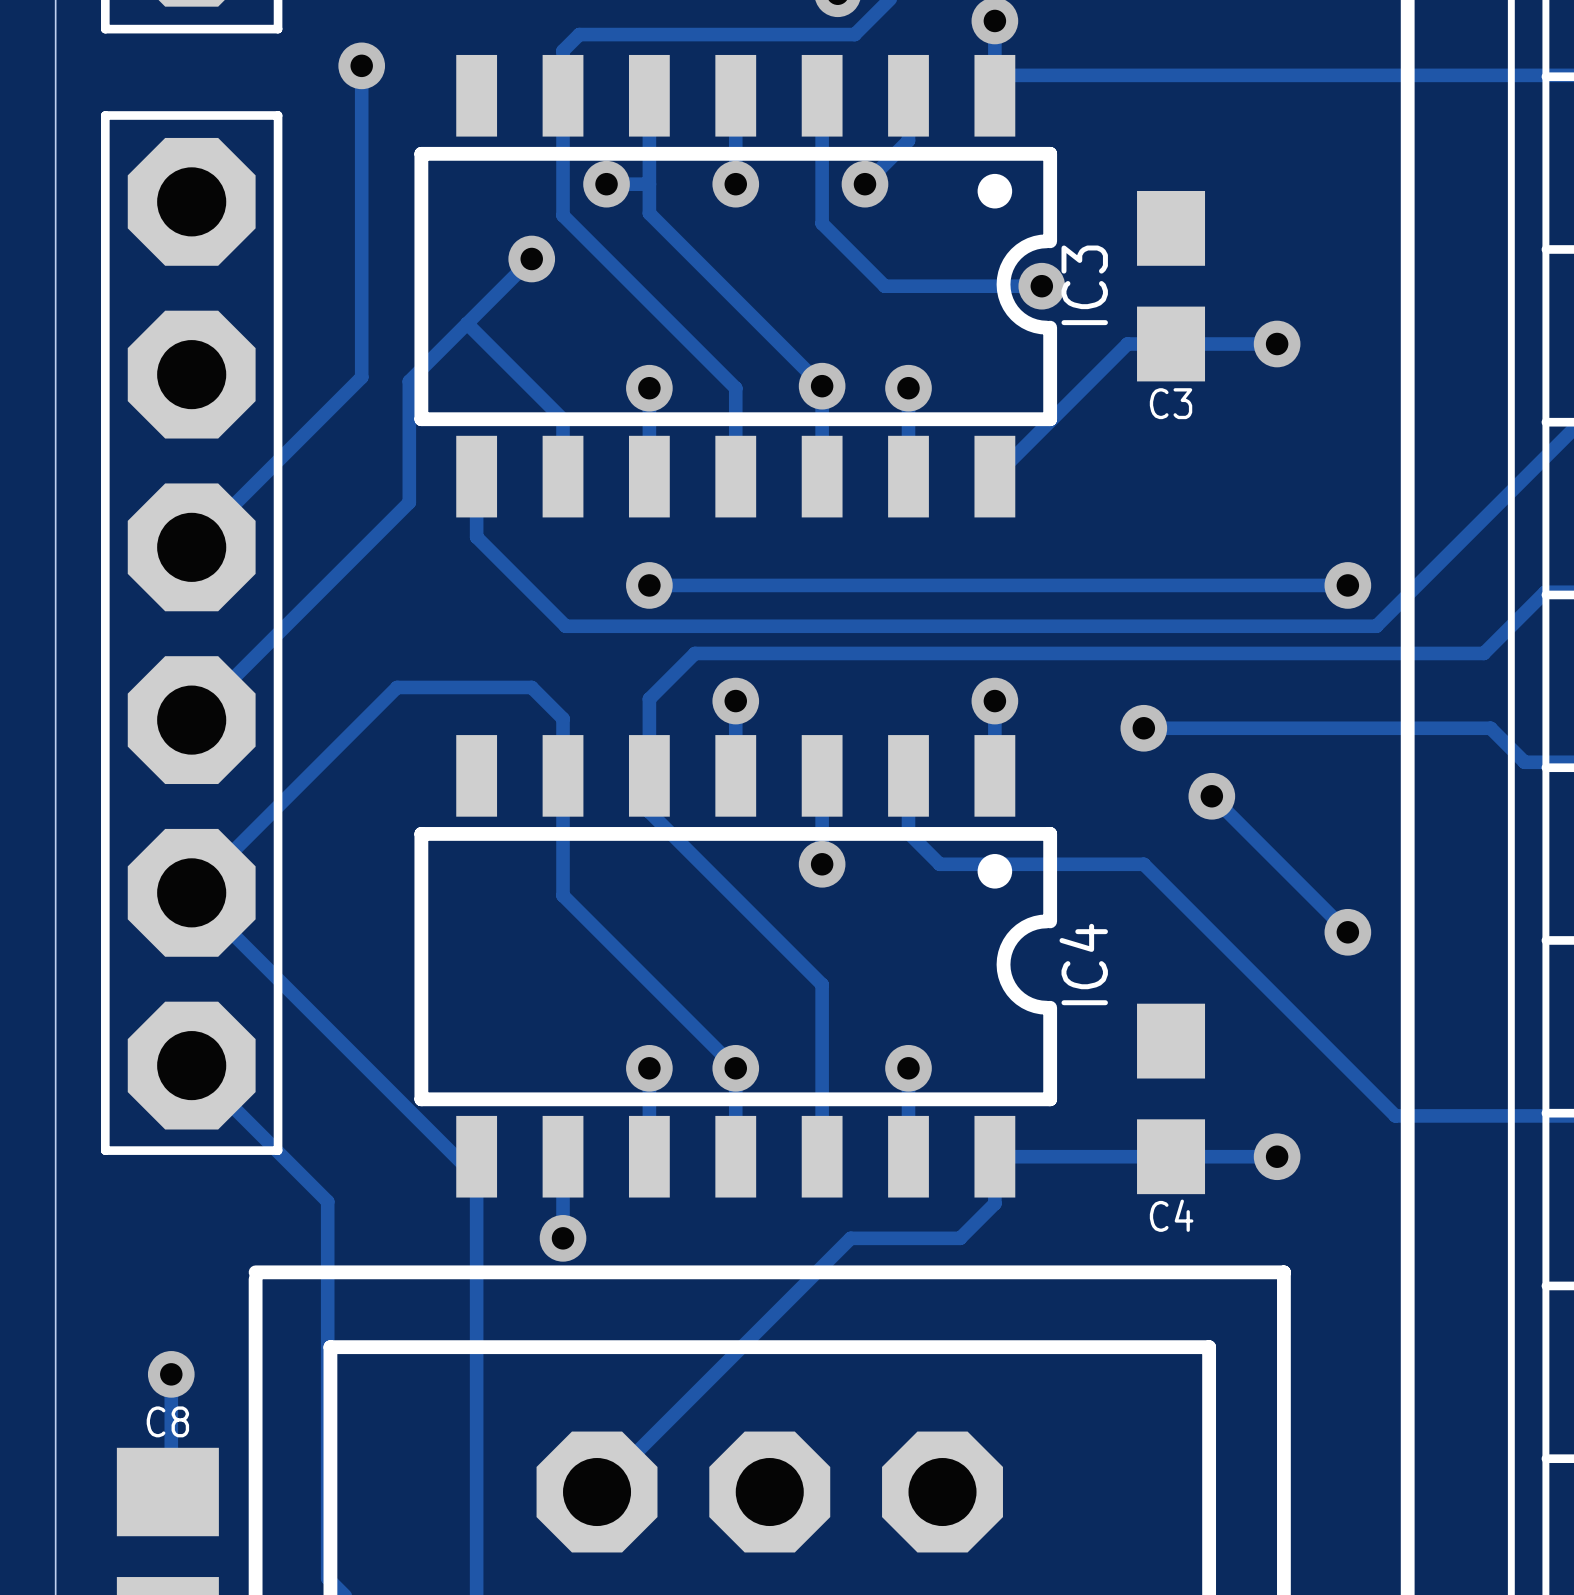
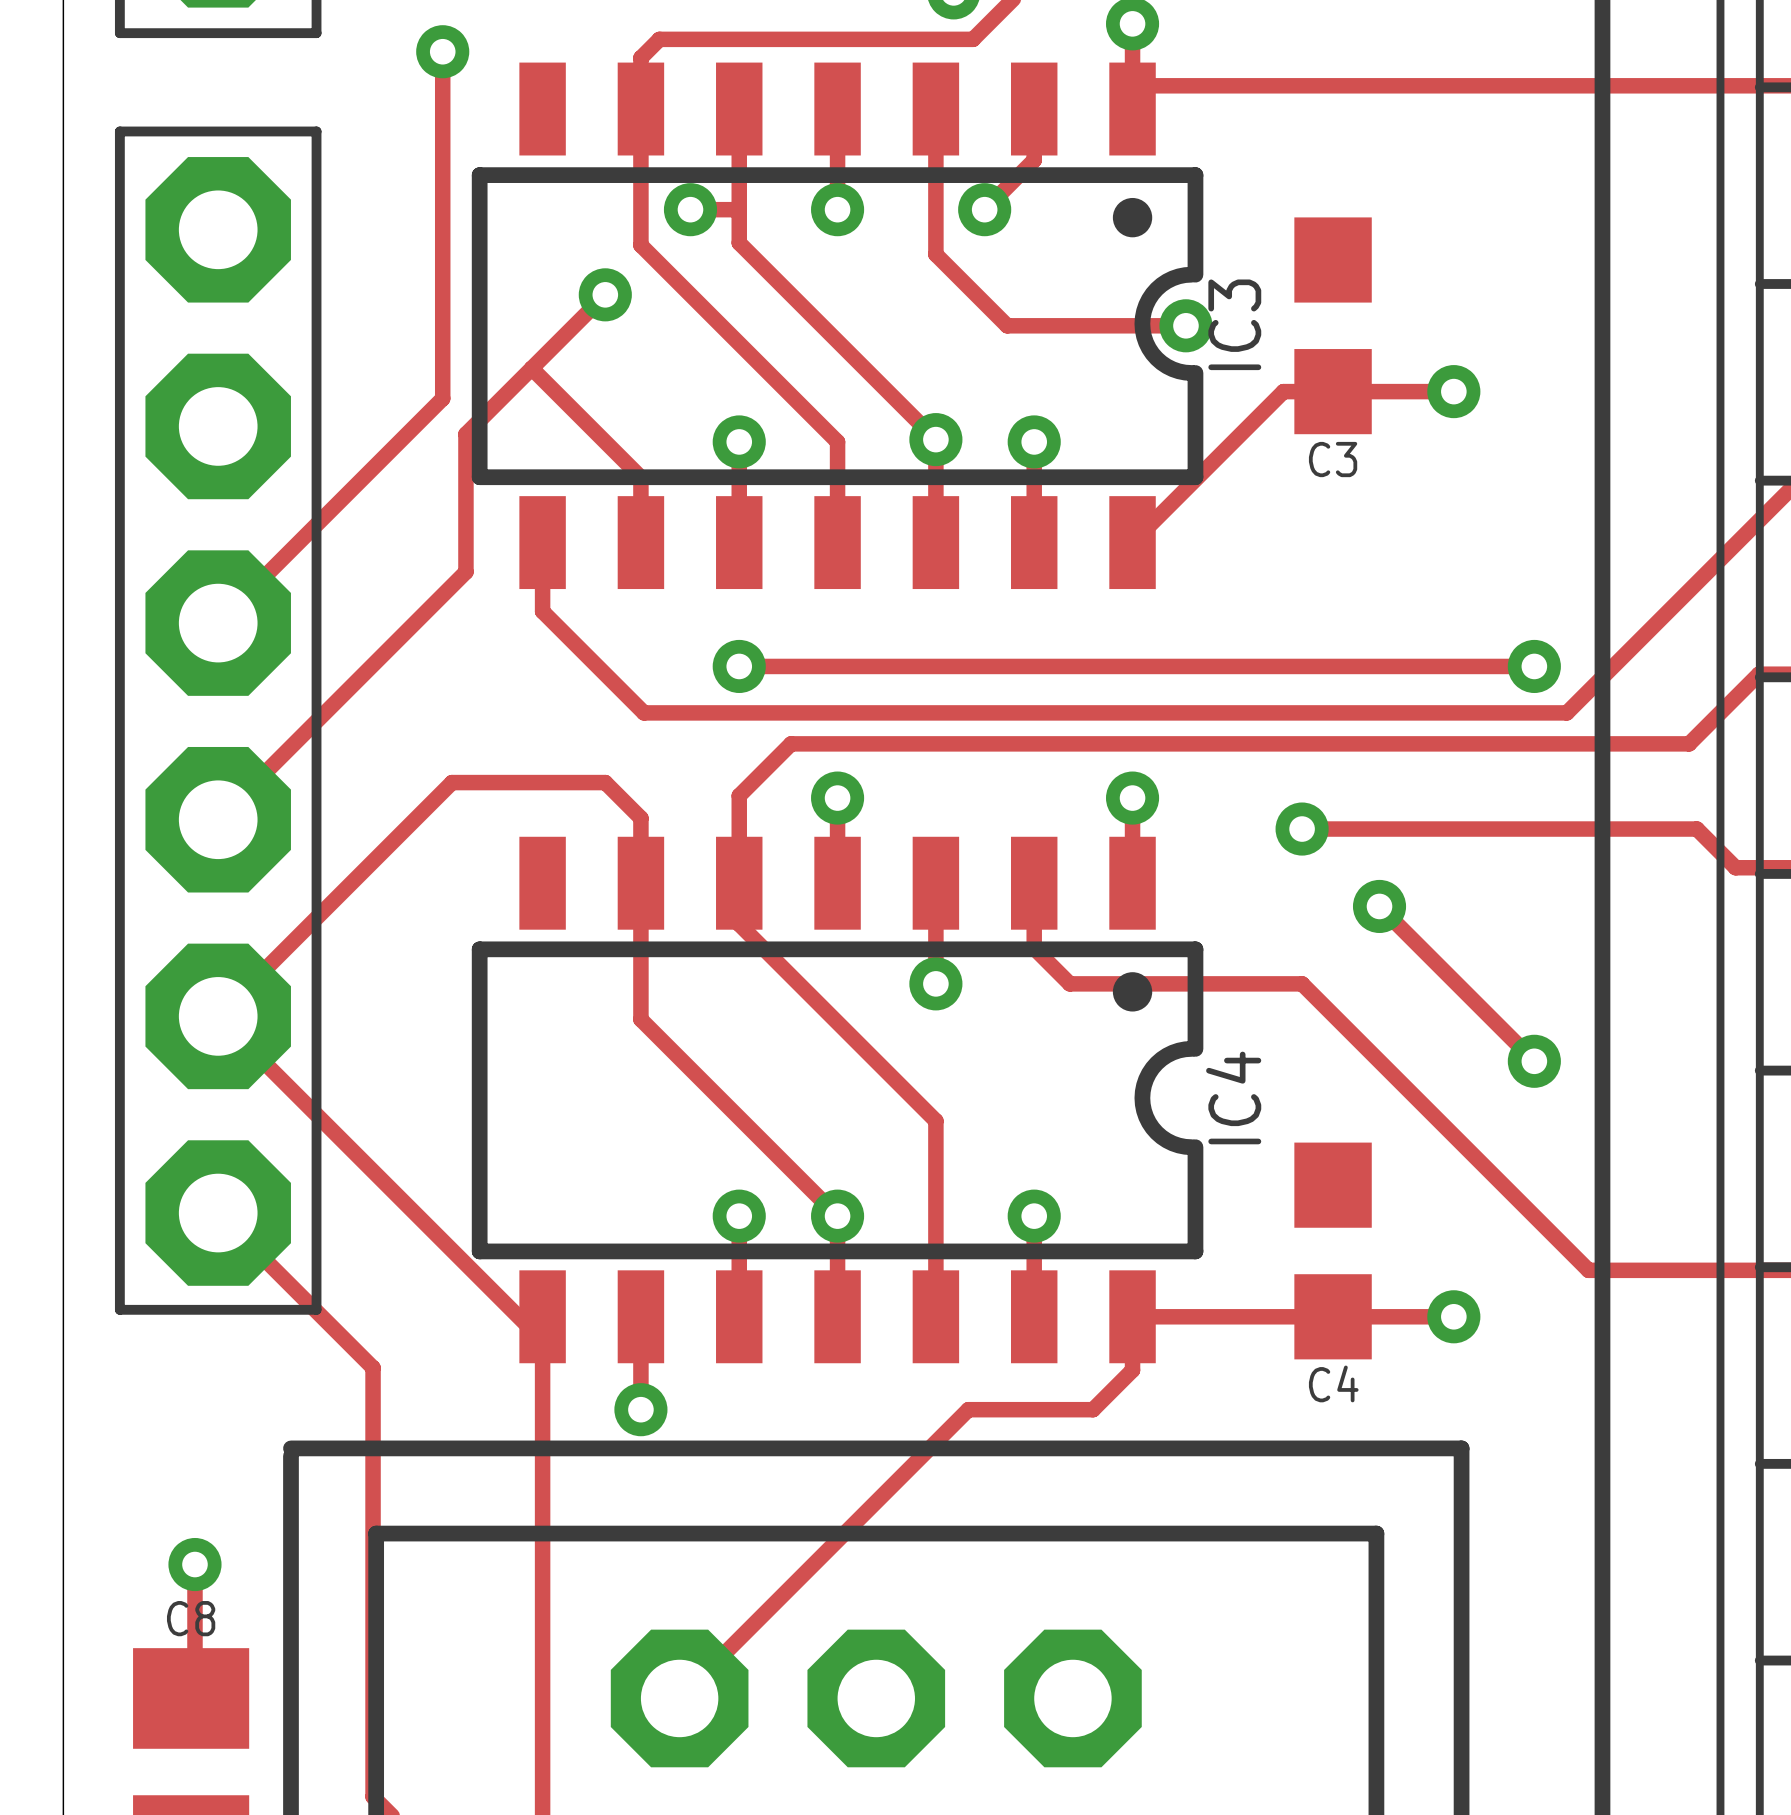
track: (361, 65) (361, 377) -> (442, 51) (442, 398) (411, 429)
via position: (361, 65) -> (442, 51)

